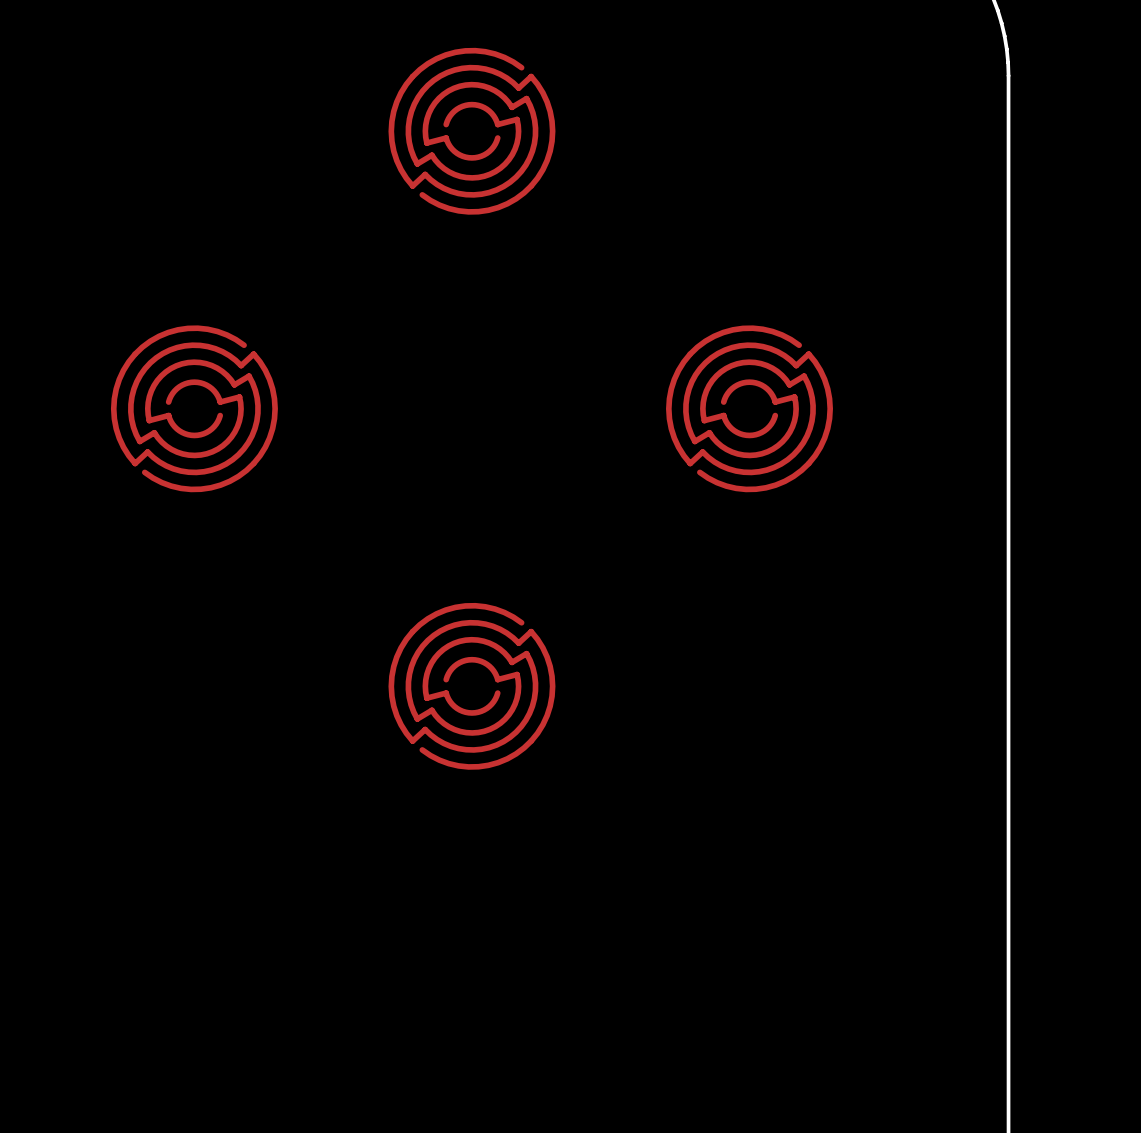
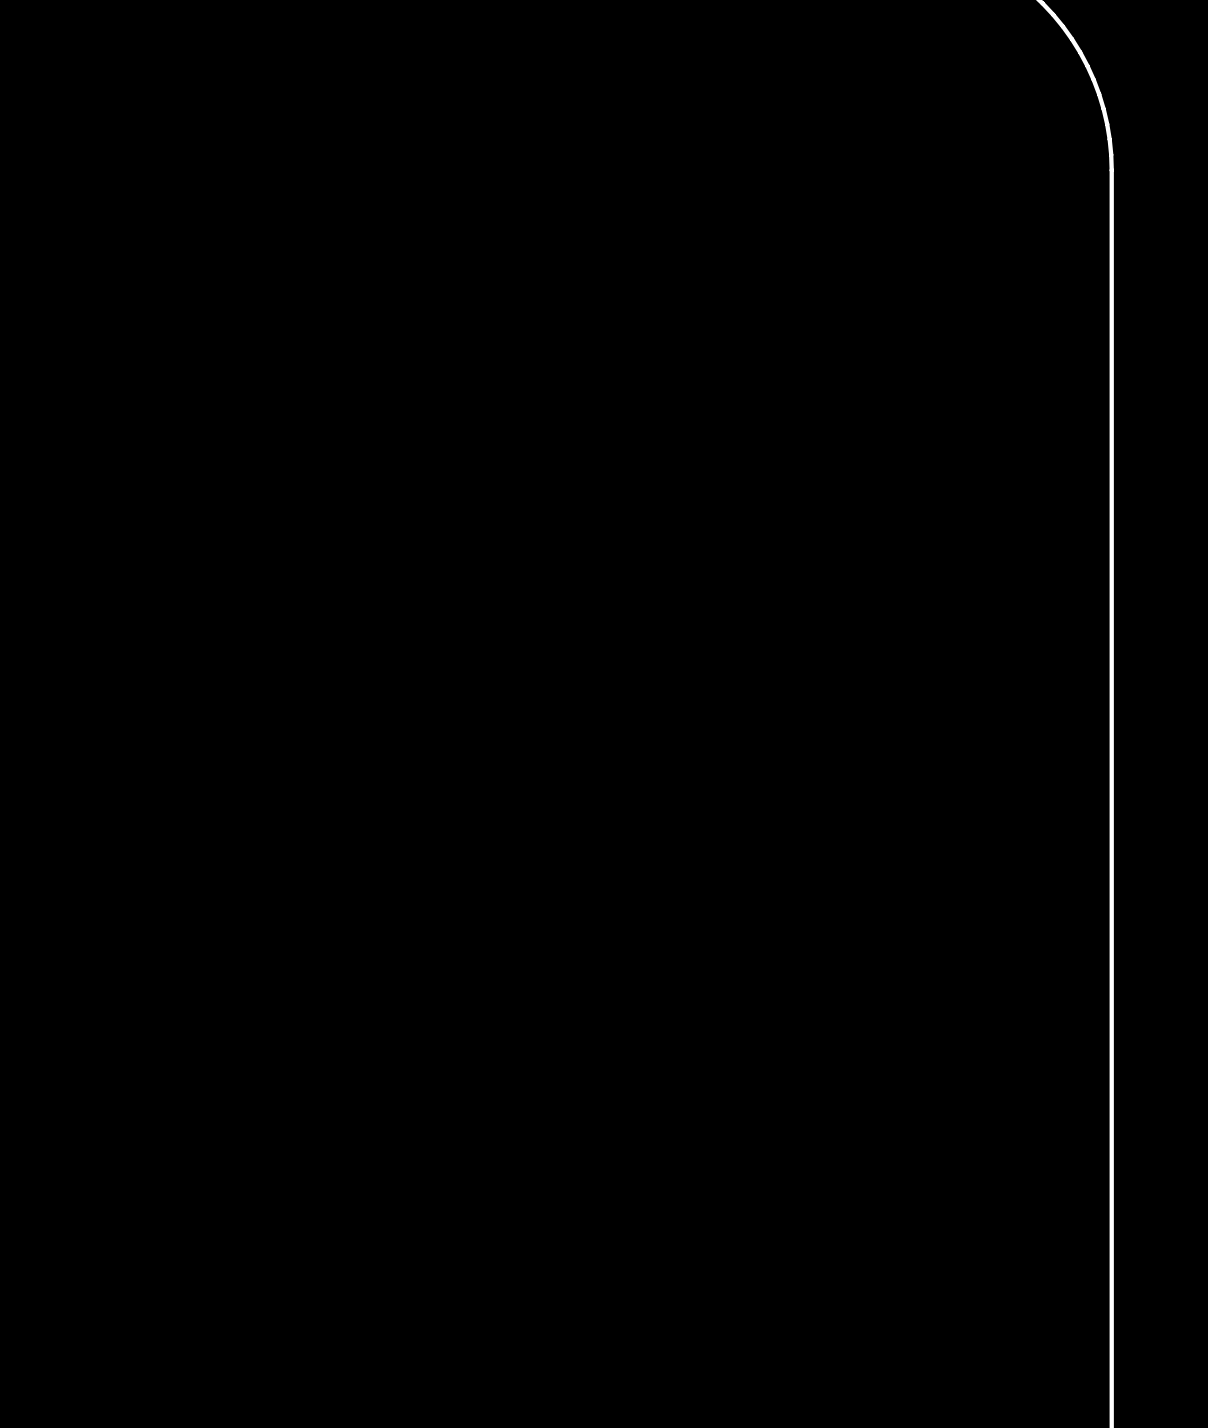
part: (471, 131) -> none
part: (194, 408) -> none
part: (749, 408) -> none
part: (471, 686) -> none

